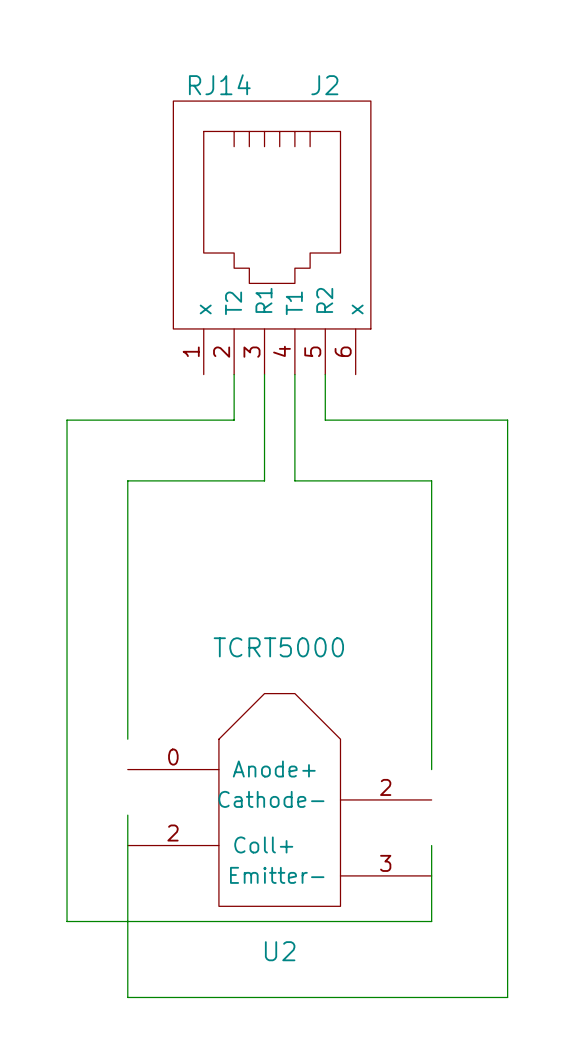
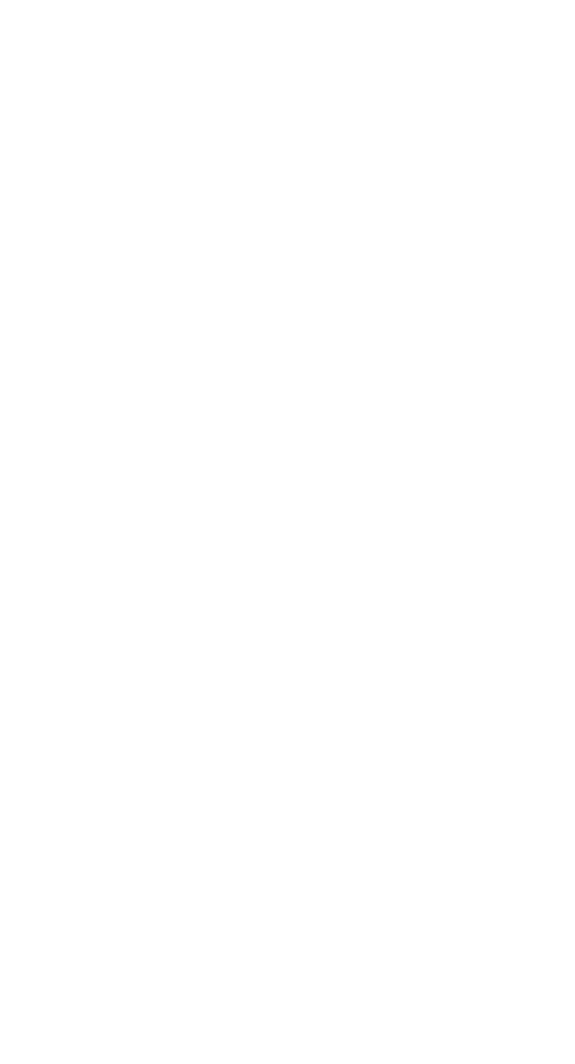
J2: RJ14 (272, 237) -> none
wire: (234, 374) (234, 420) (67, 420) (67, 921) (431, 921) (431, 845) -> none
wire: (264, 374) (264, 480) (127, 480) (127, 739) -> none
wire: (294, 374) (294, 480) (431, 480) (431, 769) -> none
wire: (325, 374) (325, 420) (507, 420) (507, 997) (127, 997) (127, 815) -> none
U2: TCRT5000 (279, 799) -> none

